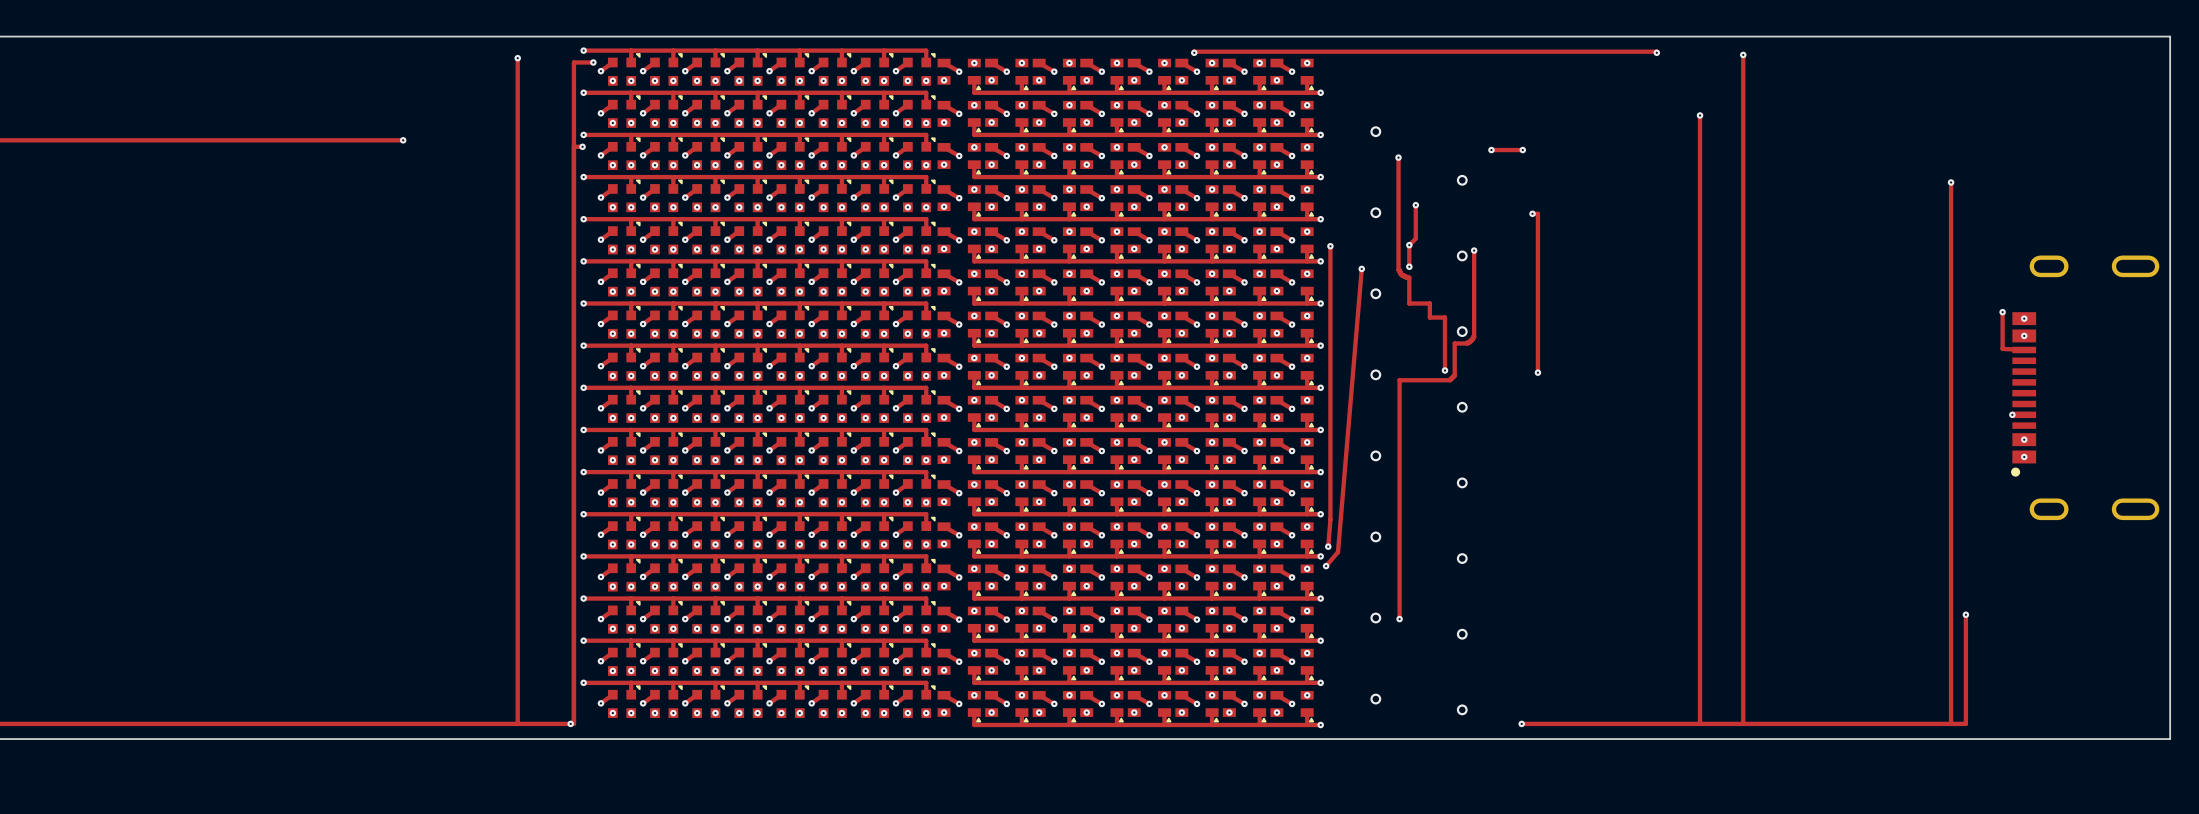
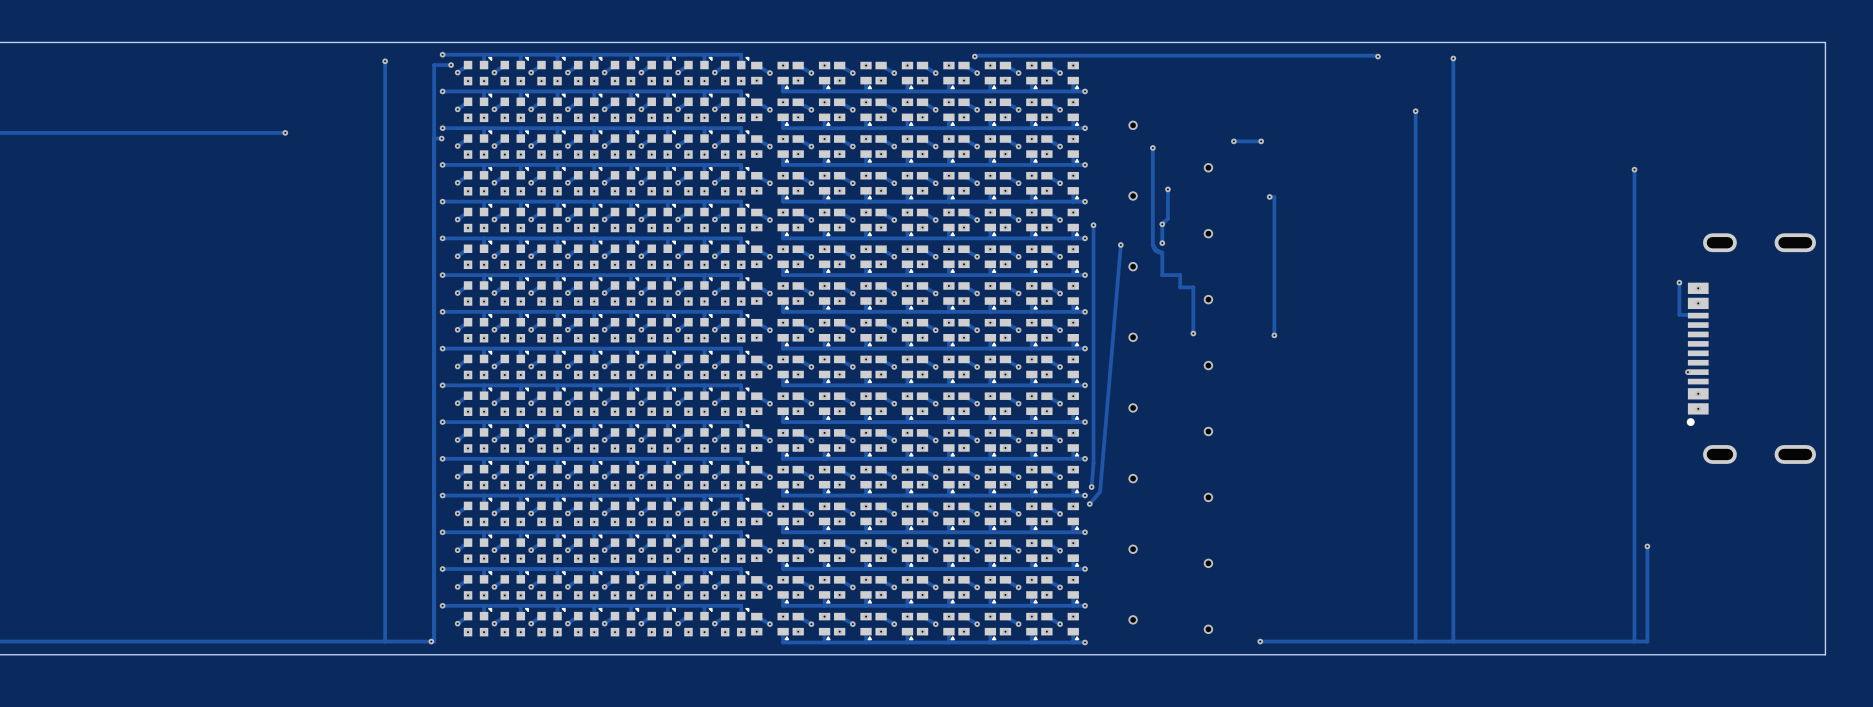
track: (1474, 250) (1474, 337) (1467, 343) (1454, 343) (1454, 375) (1450, 380) (1399, 380) (1399, 619) -> none
via: (1474, 250) -> none
via: (1399, 619) -> none

